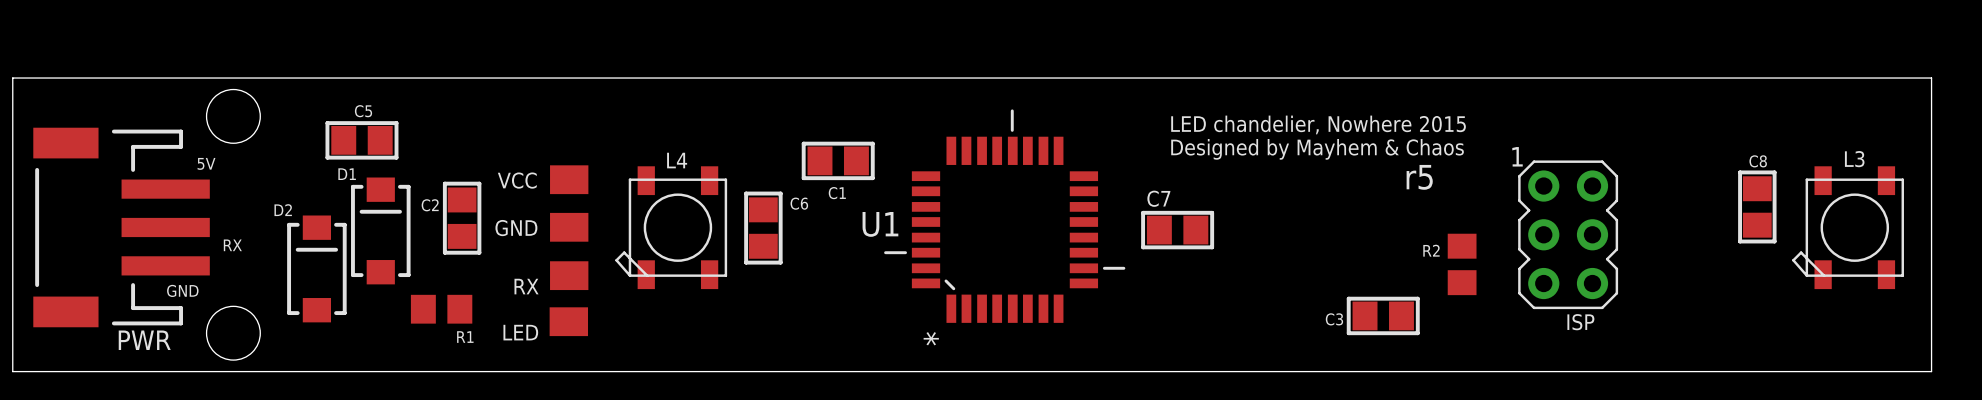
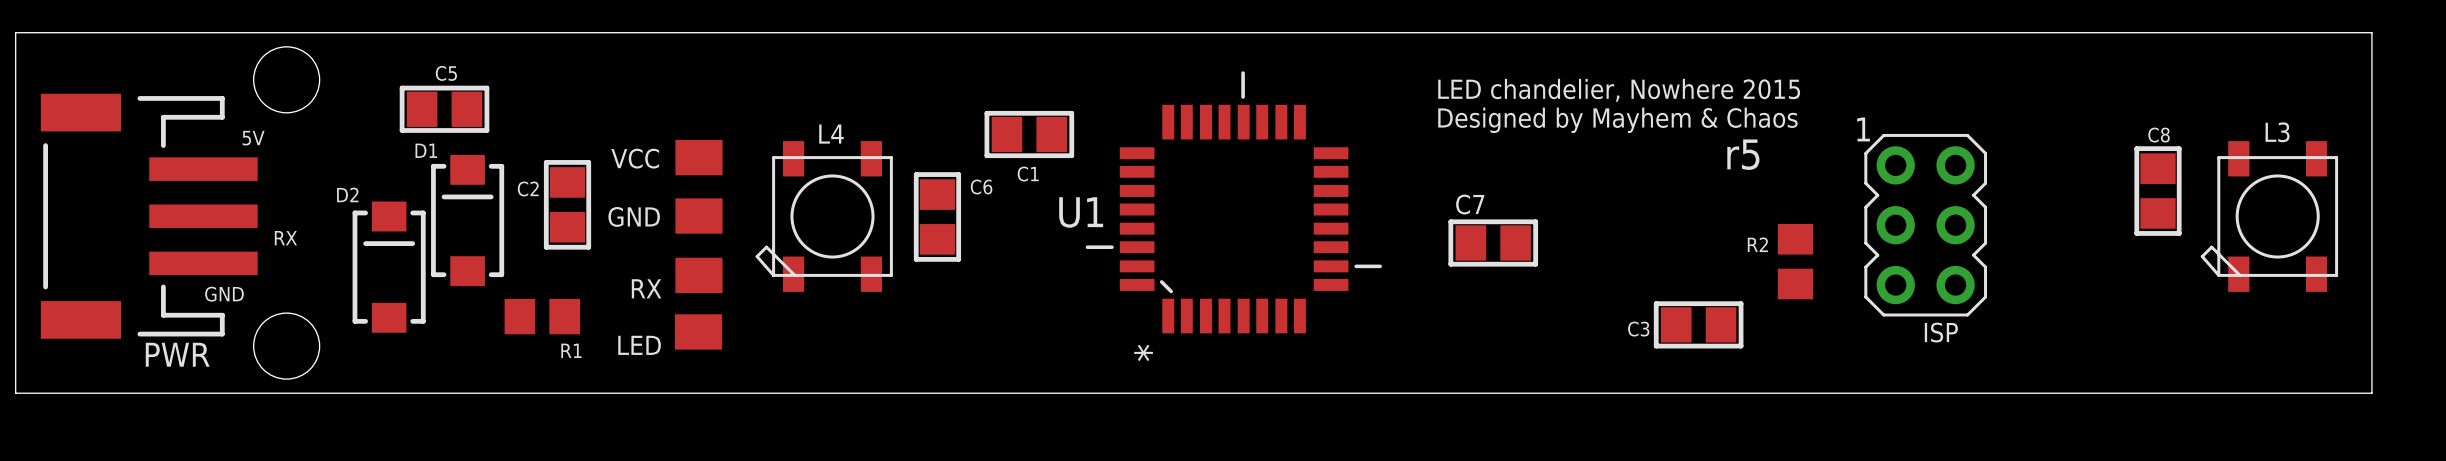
C7 position: (1177, 230) -> (1493, 243)

